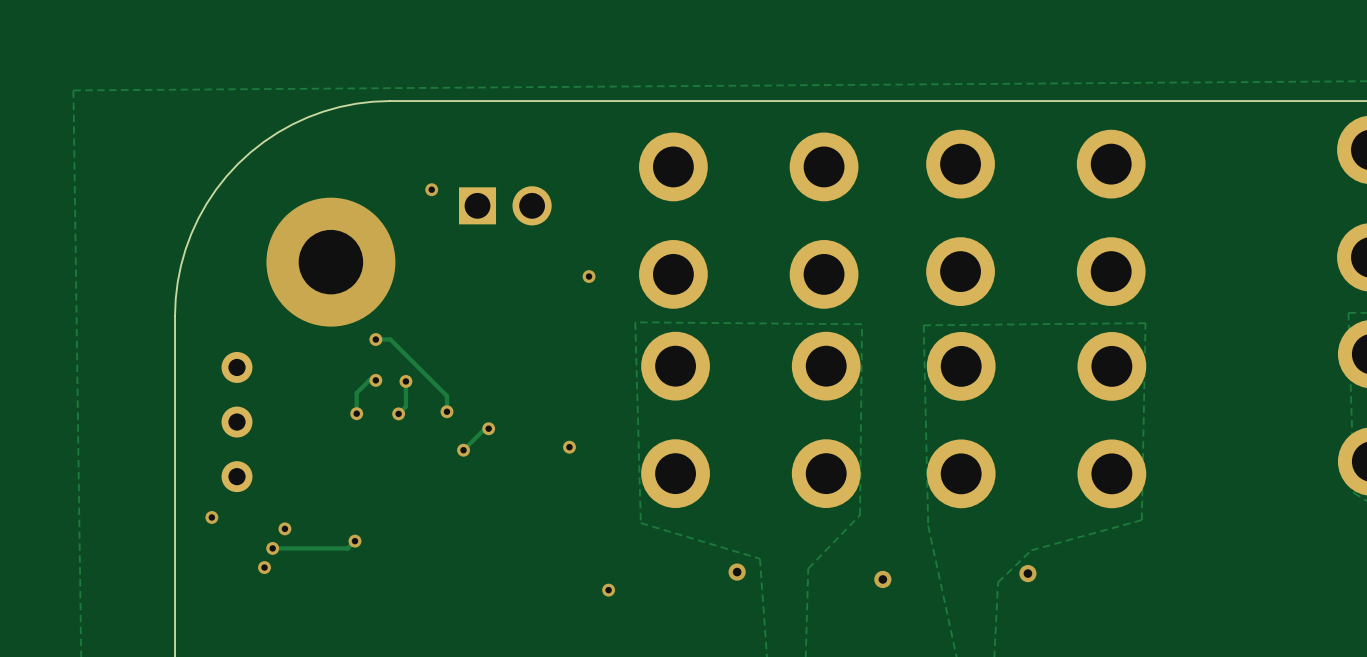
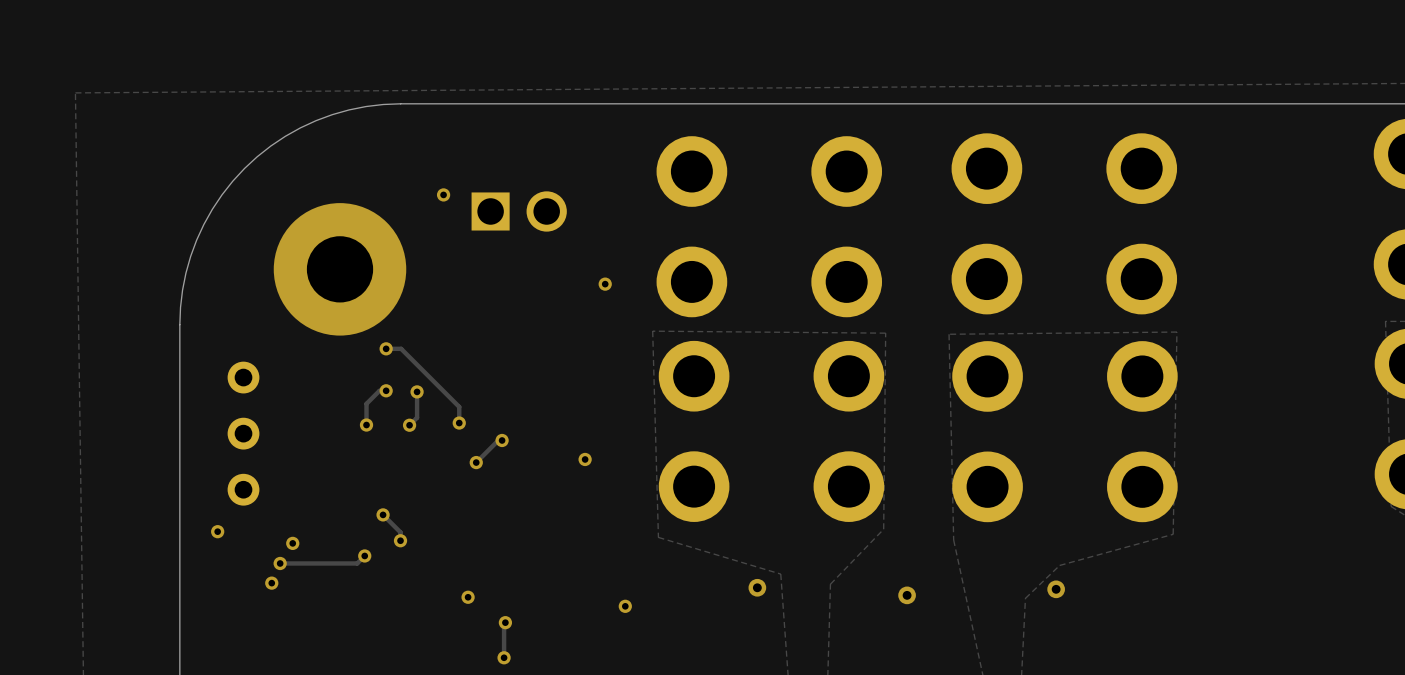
track: none -> (383, 514) (400, 532) (400, 540)
via: none -> (383, 514)
via: none -> (400, 540)
via: none -> (468, 597)
track: none -> (505, 622) (504, 657)
via: none -> (505, 622)
via: none -> (504, 657)

